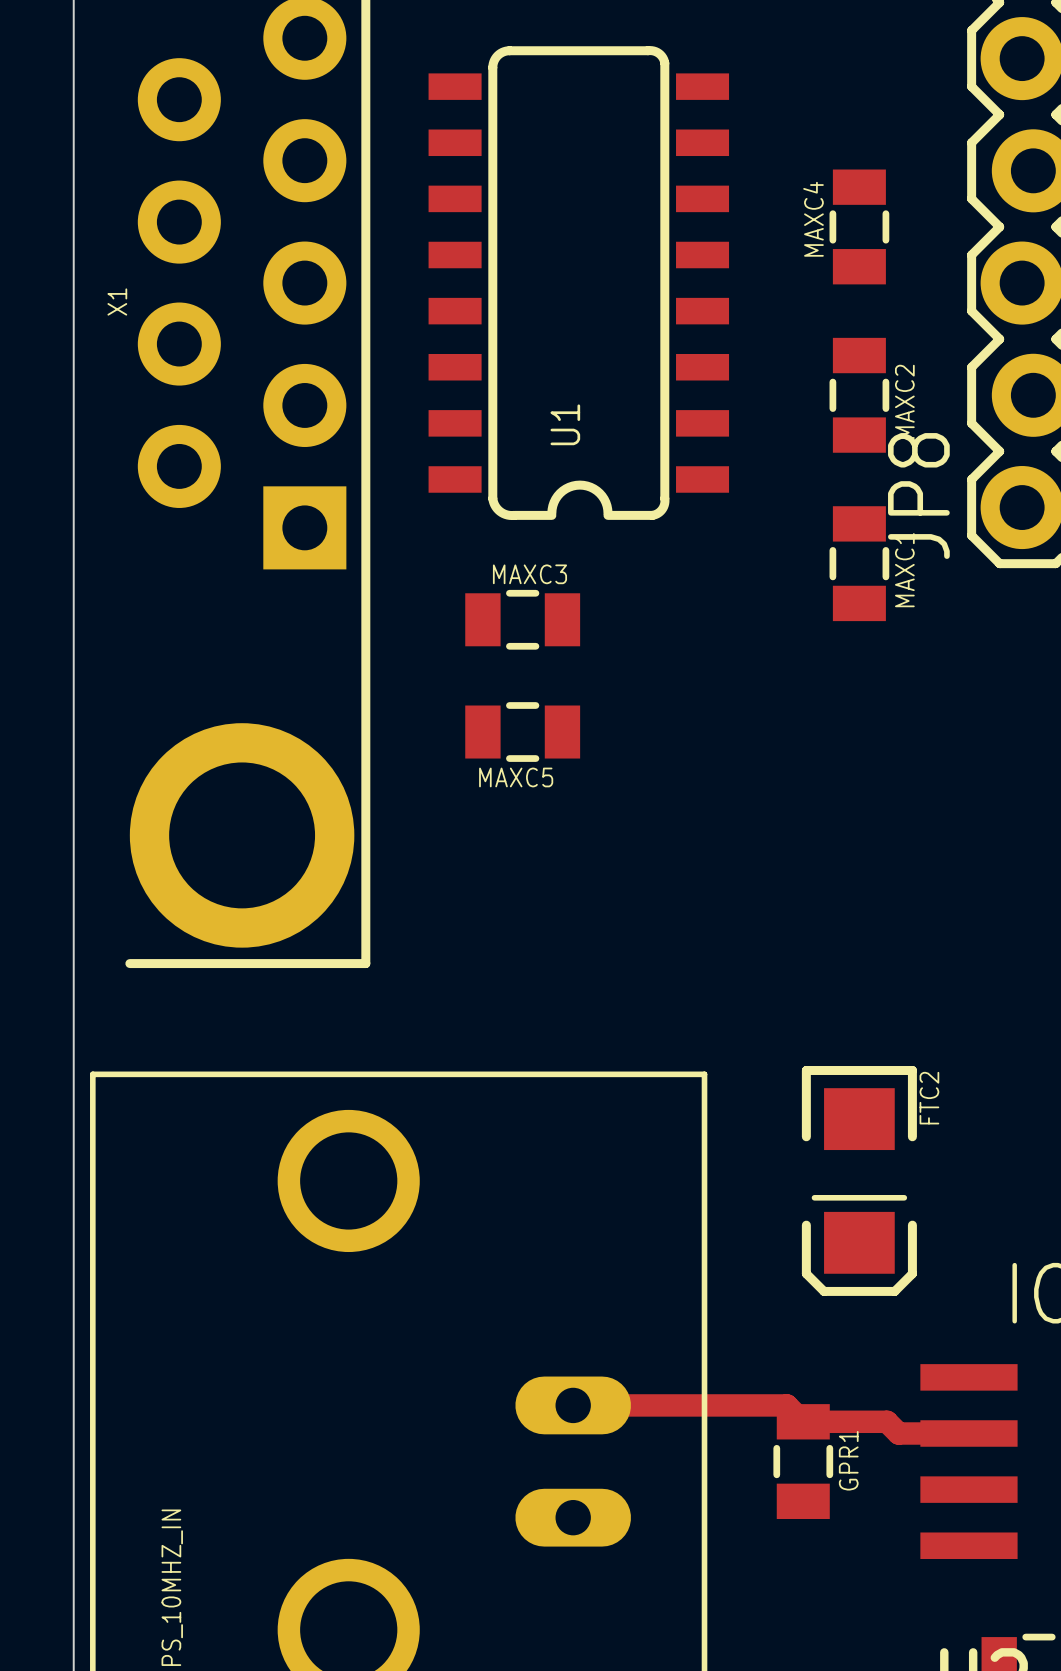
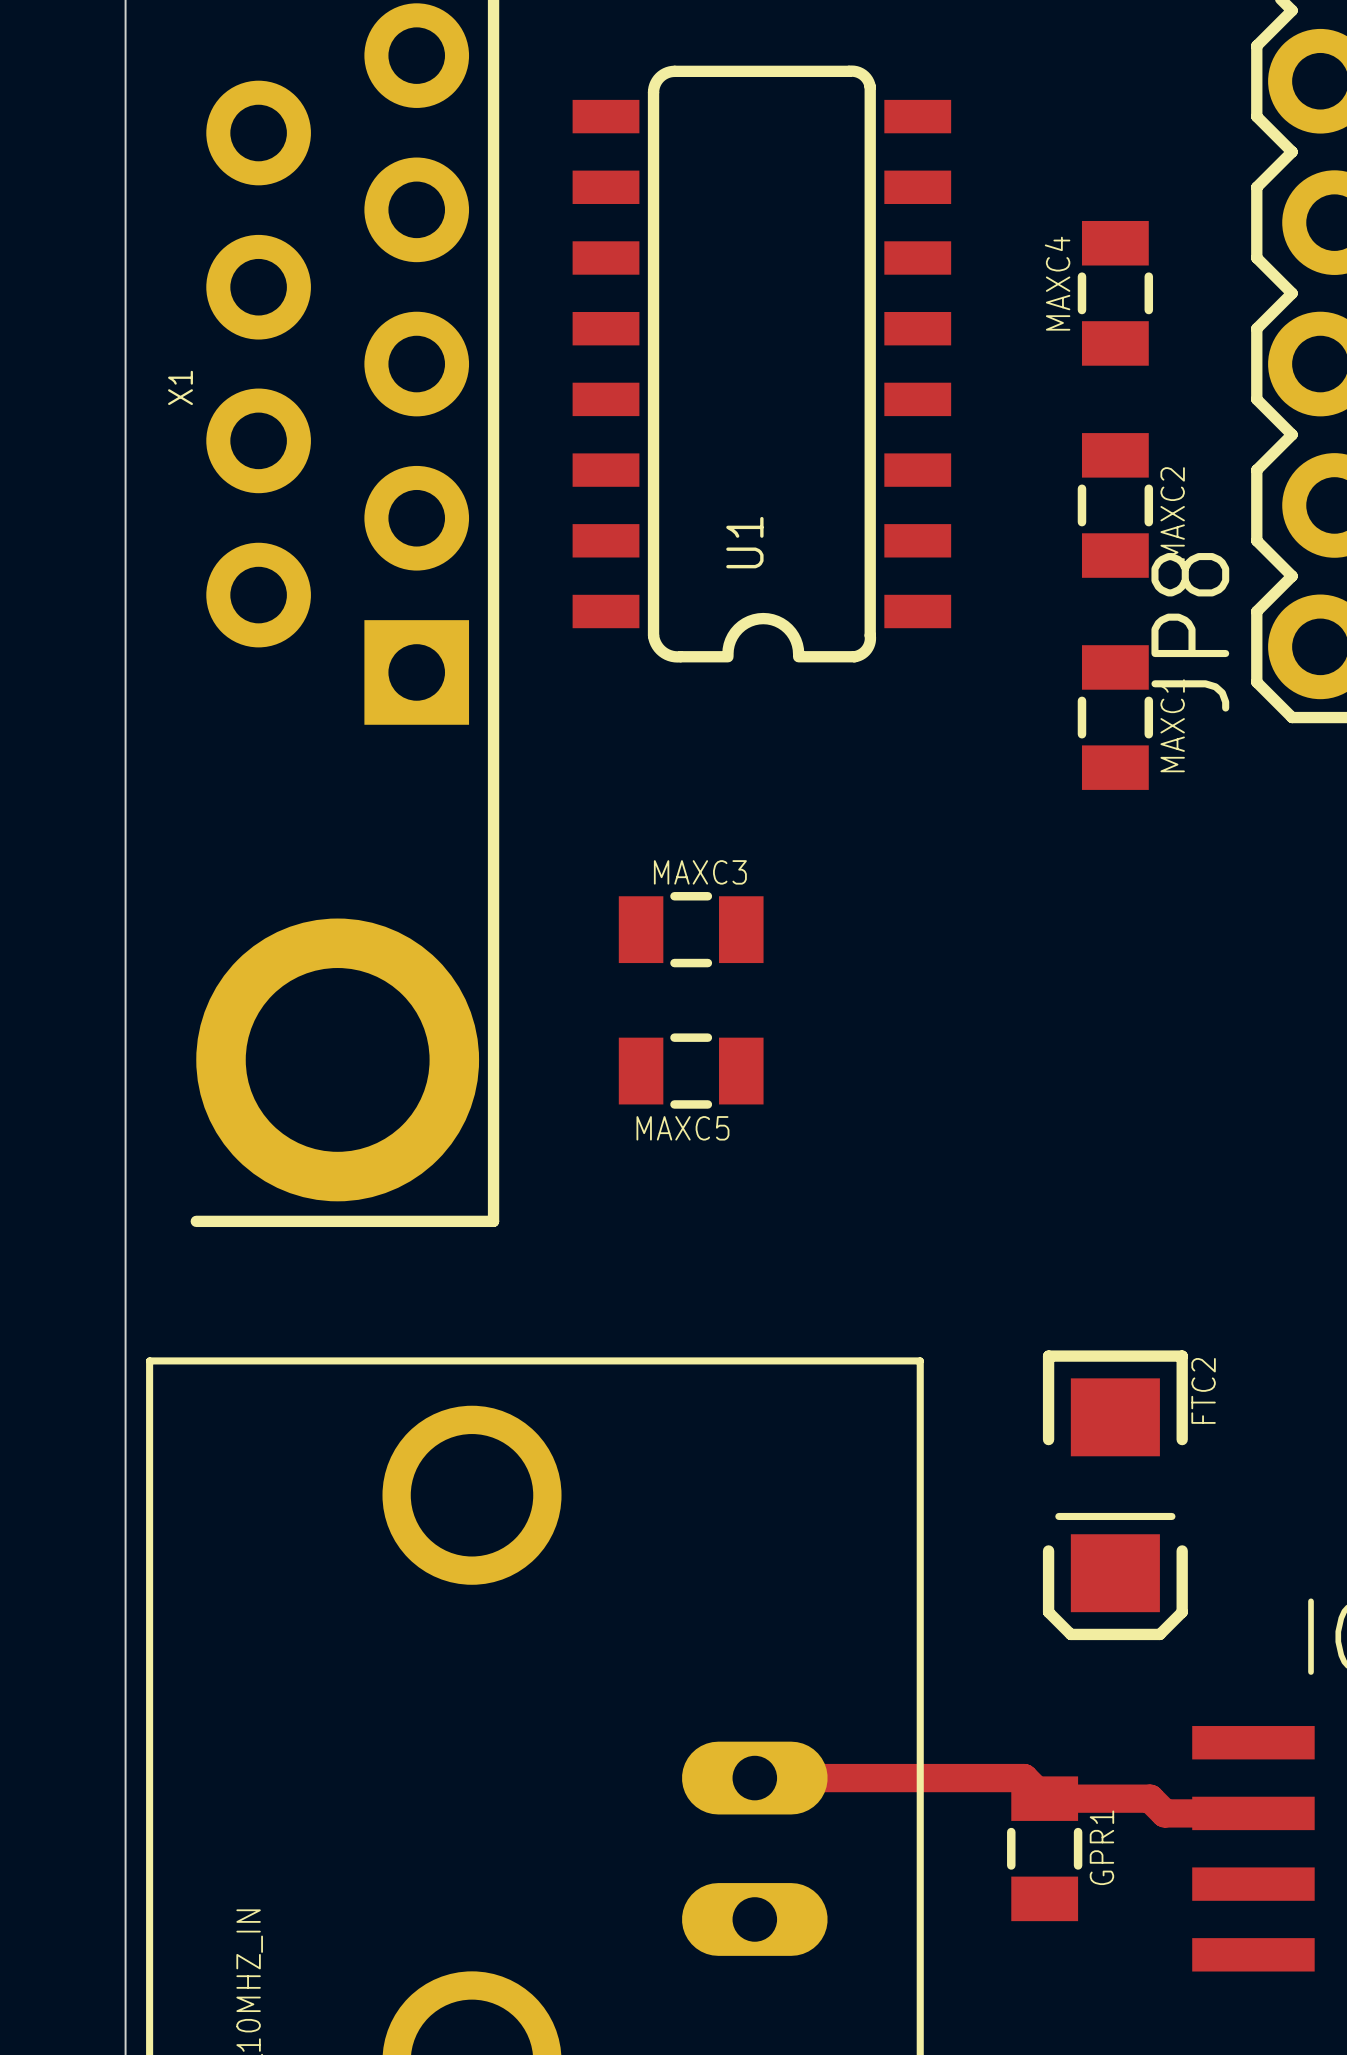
MAXC3: (522, 619) -> none
MAXC5 name: MAXC5 (516, 777) -> MAXC3 (700, 872)
MAXC5: none -> (691, 1071)

